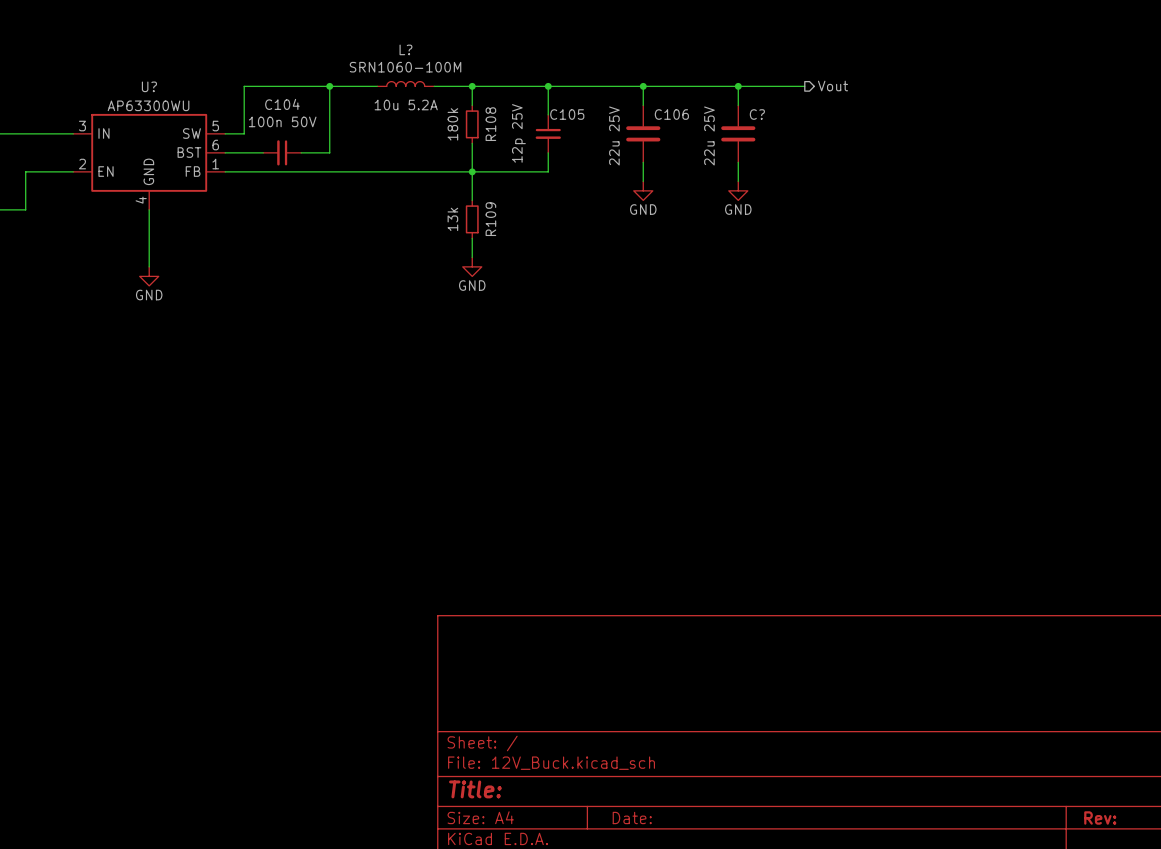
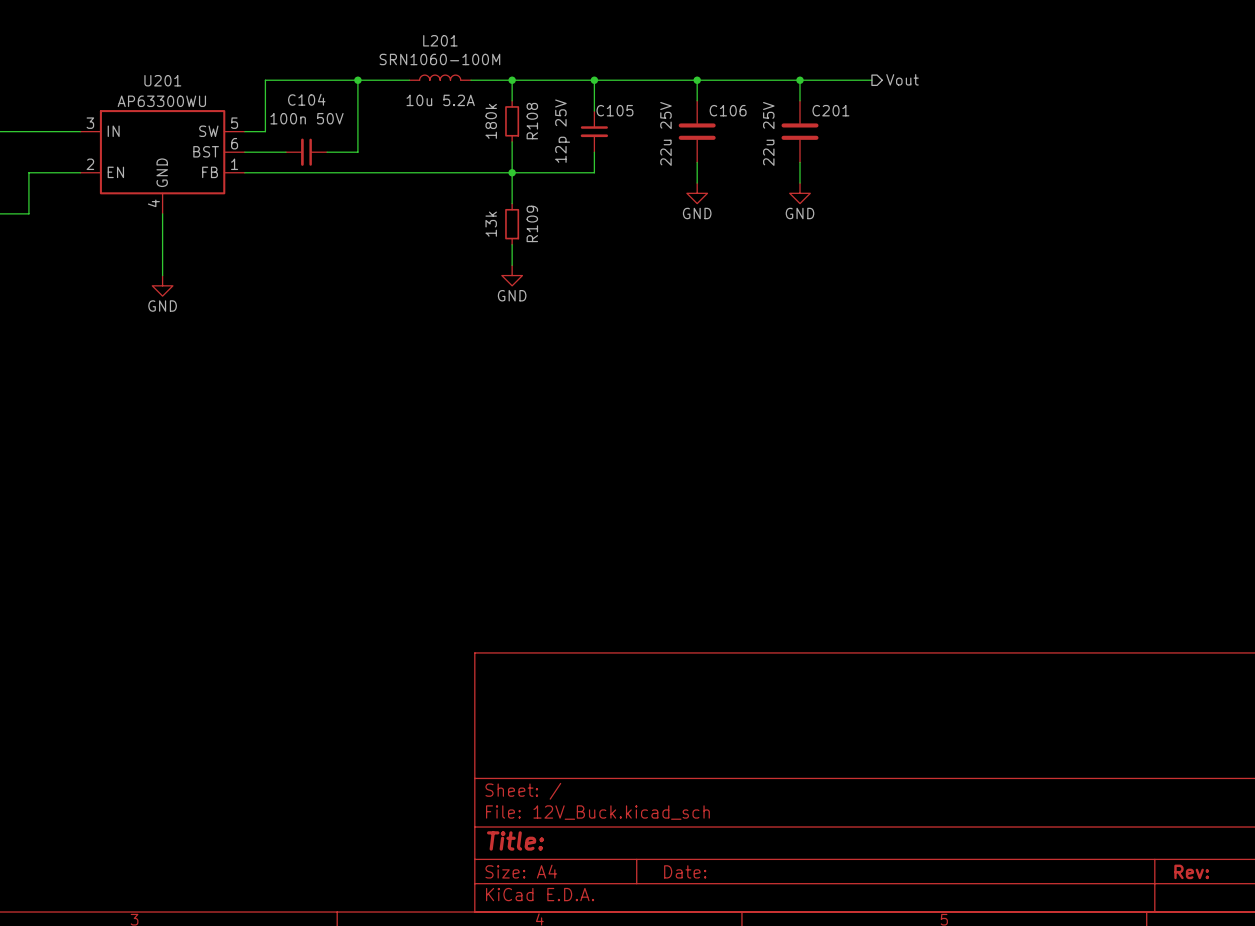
L? name: L? (405, 49) -> L201 (440, 40)
U? name: U? (149, 86) -> U201 (162, 80)
C? name: C? (757, 114) -> C201 (830, 110)

